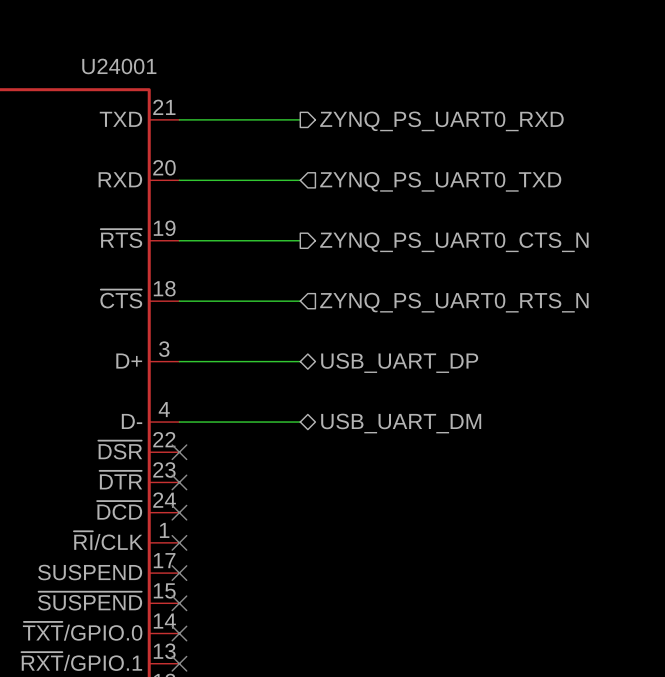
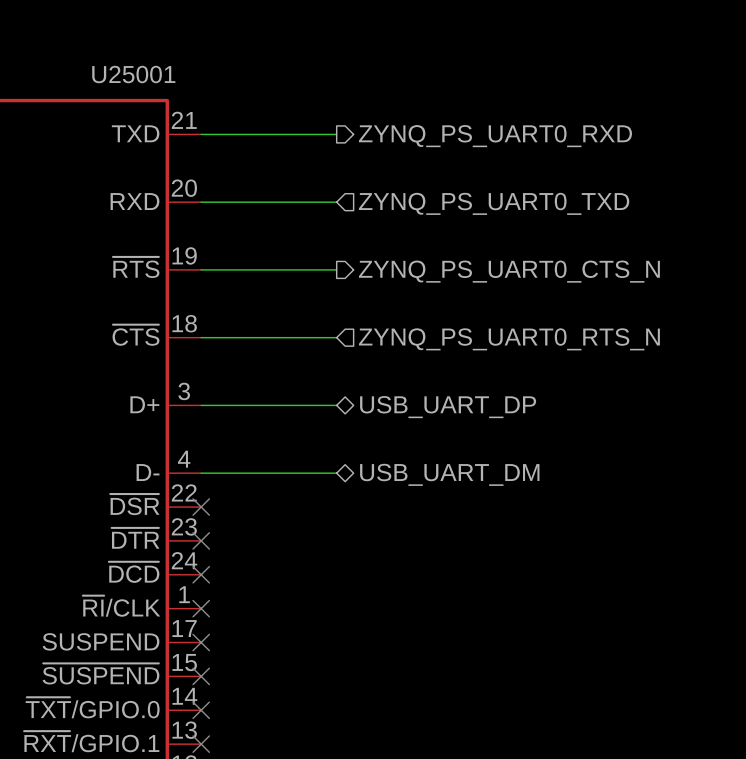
U24001 name: U24001 (119, 66) -> U25001 (133, 74)

